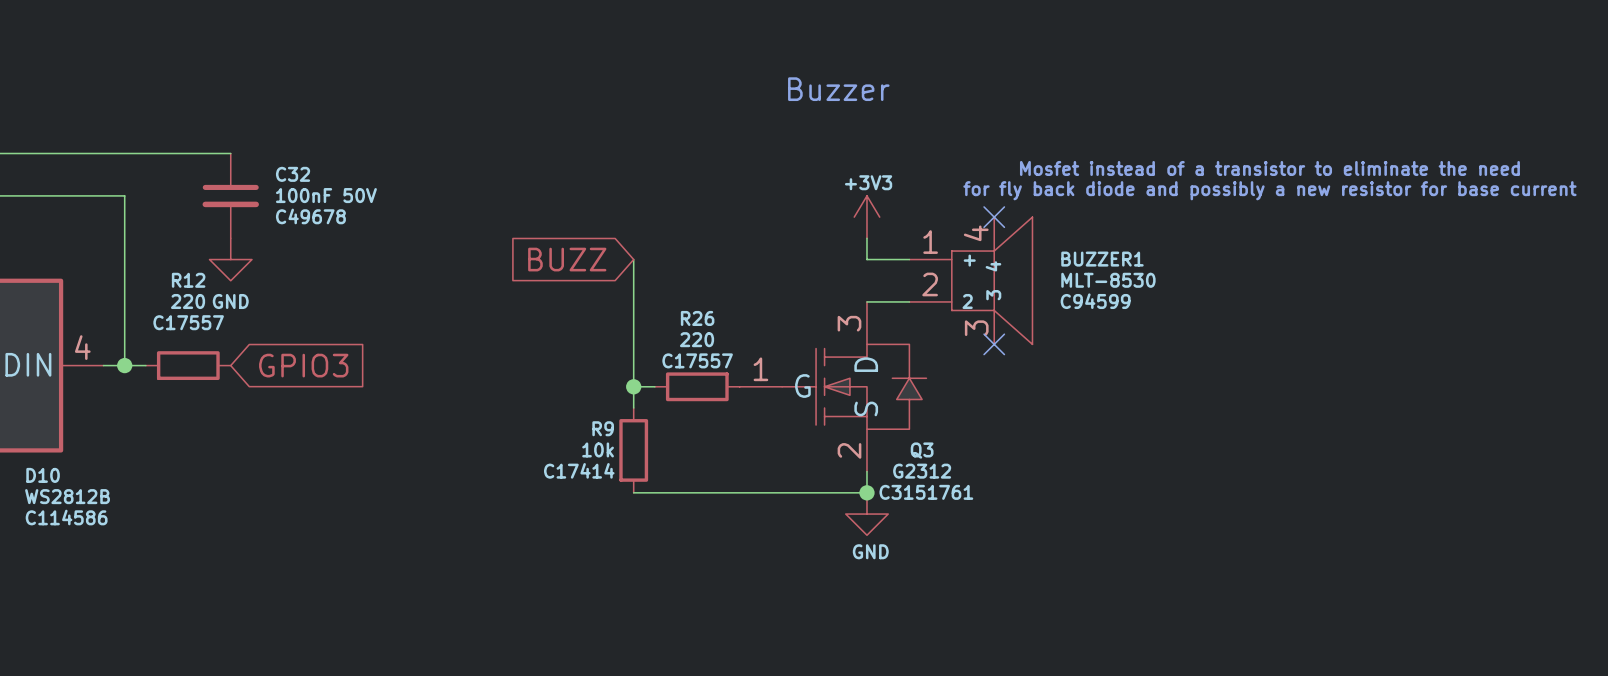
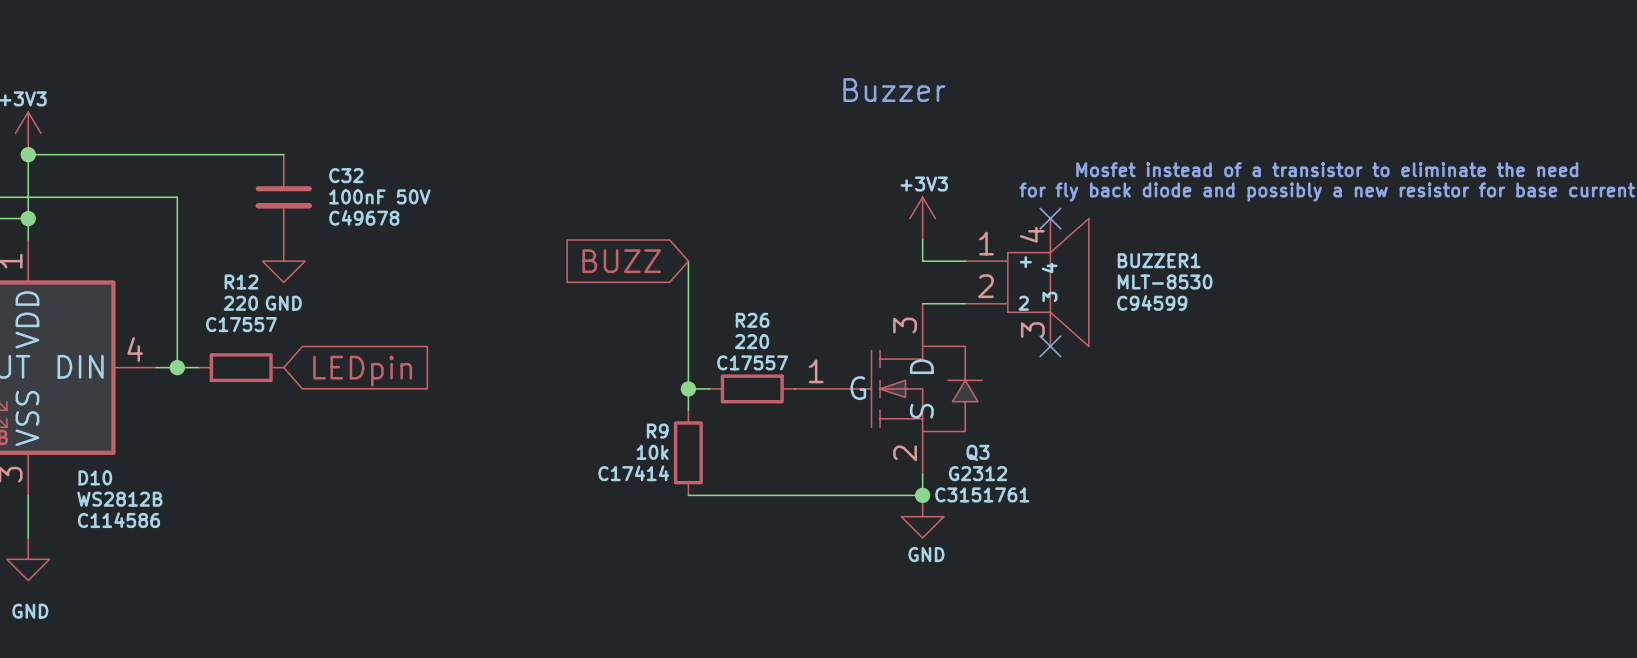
global label: GPIO3 (303, 365) -> LEDpin (362, 371)

